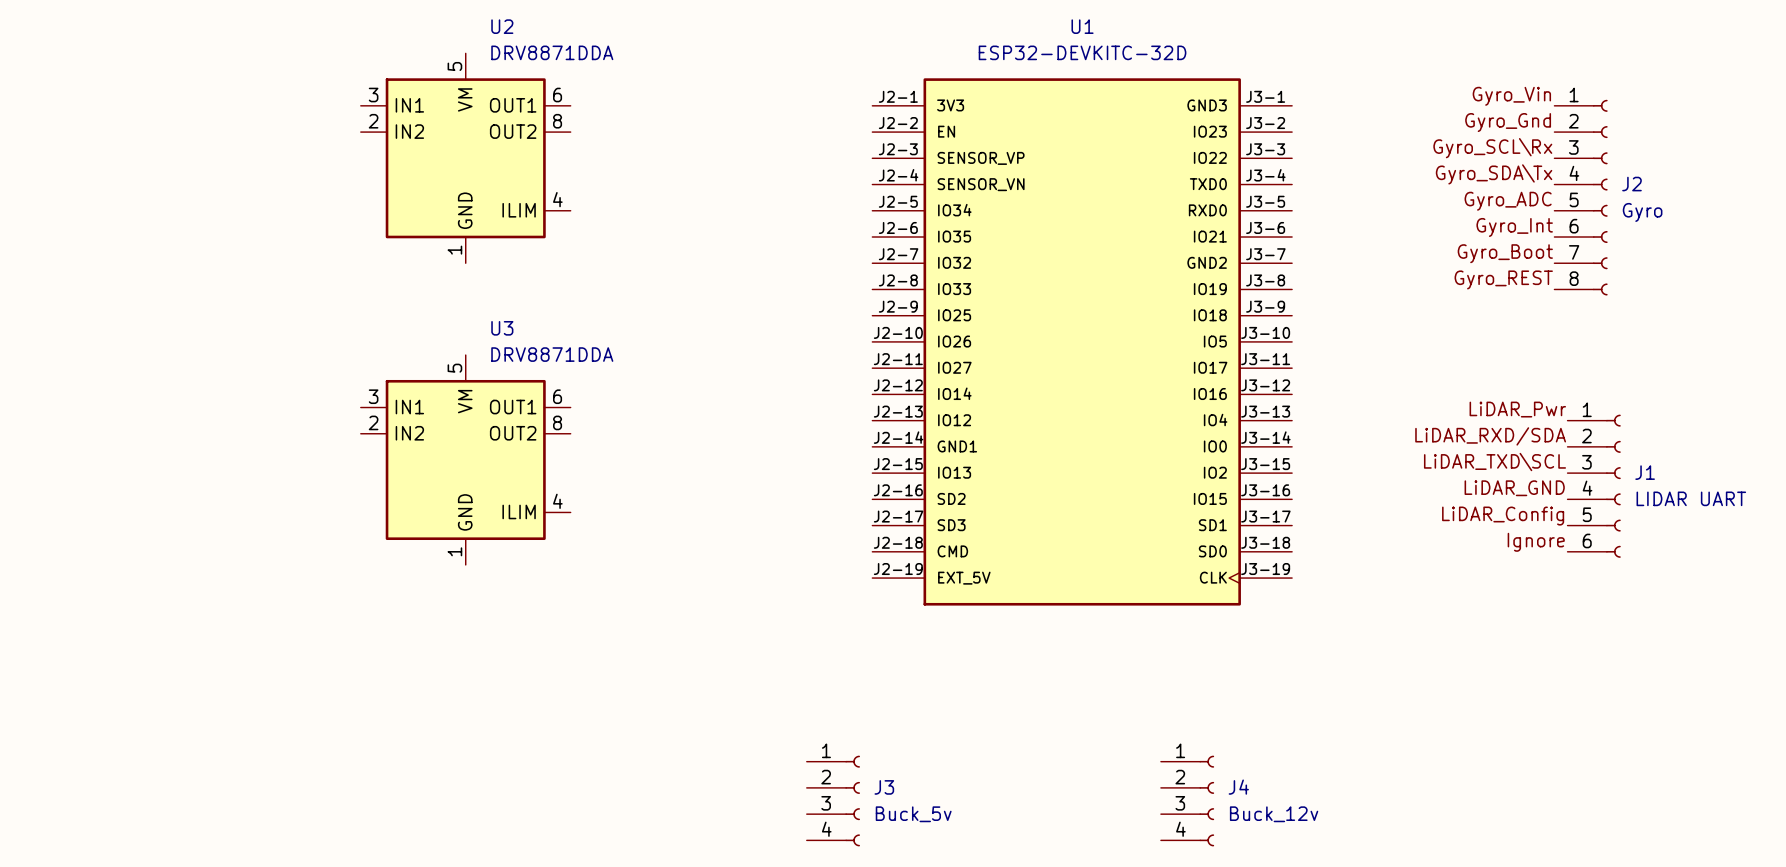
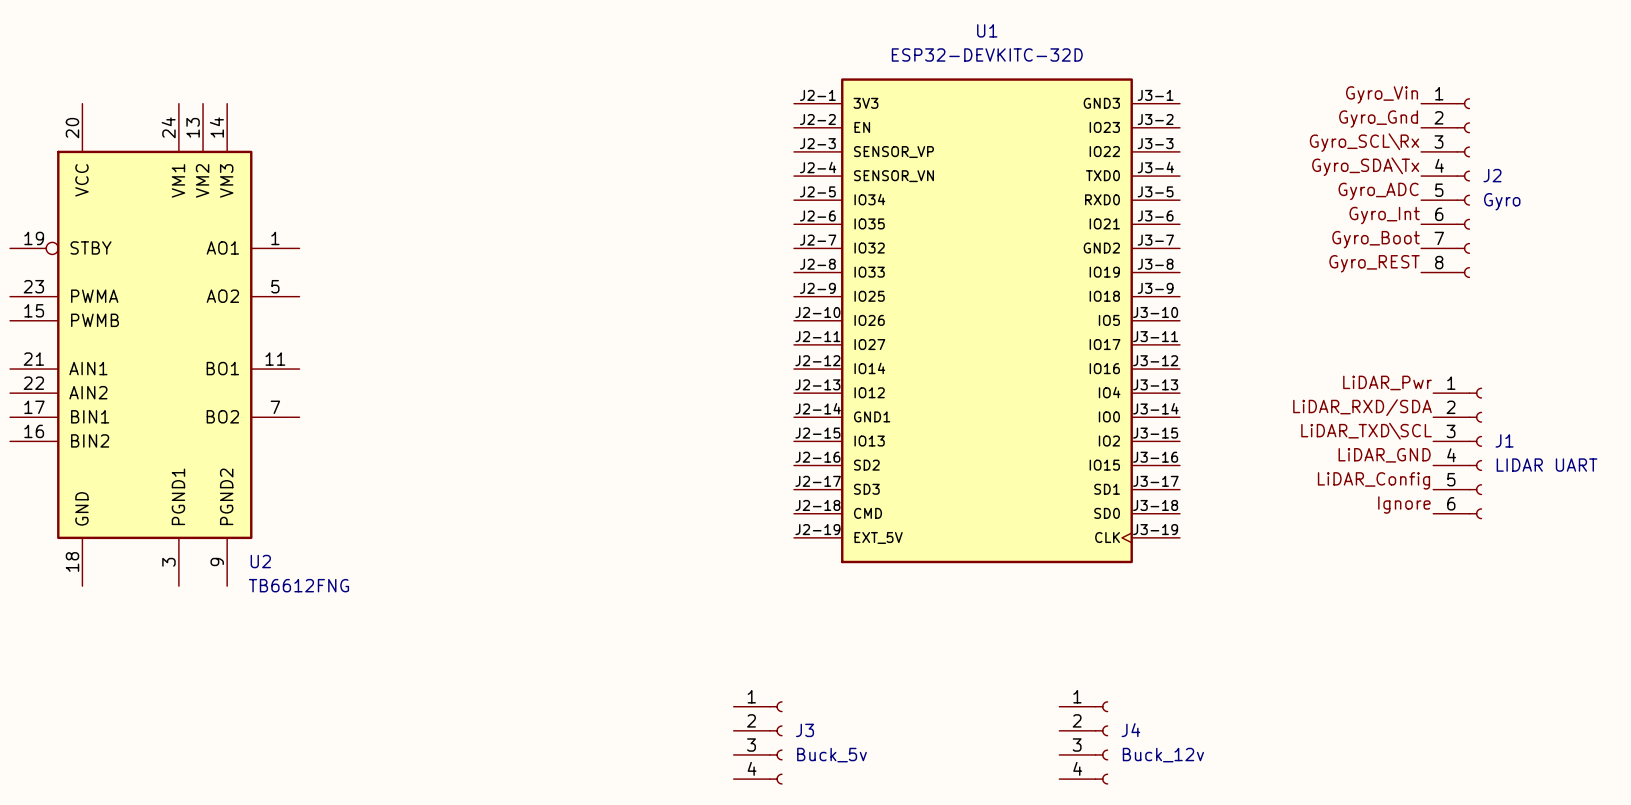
U2 name position: U2 (502, 26) -> U2 (260, 561)
U2 value: DRV8871DDA (552, 52) -> TB6612FNG (298, 585)
U2 symbol: [360, 53, 571, 264] -> [10, 103, 300, 587]
U3: DRV8871DDA (465, 459) -> none

